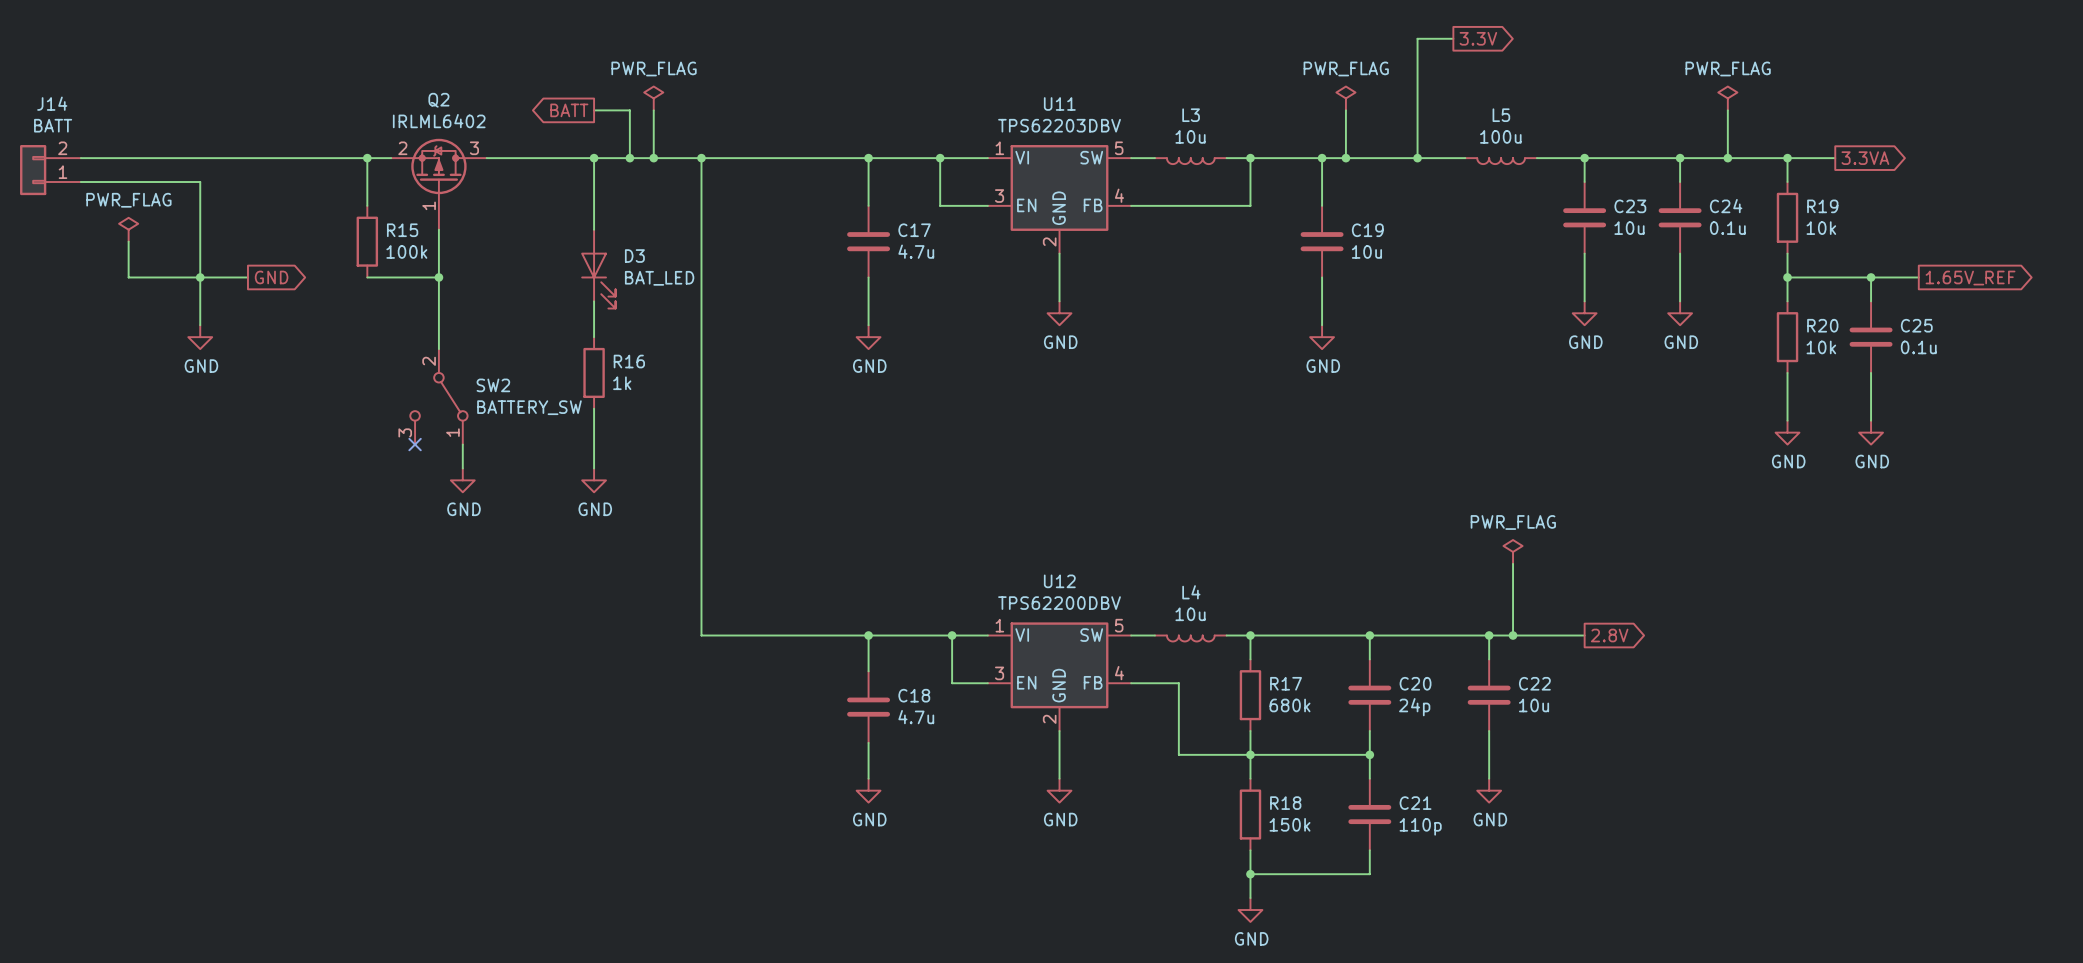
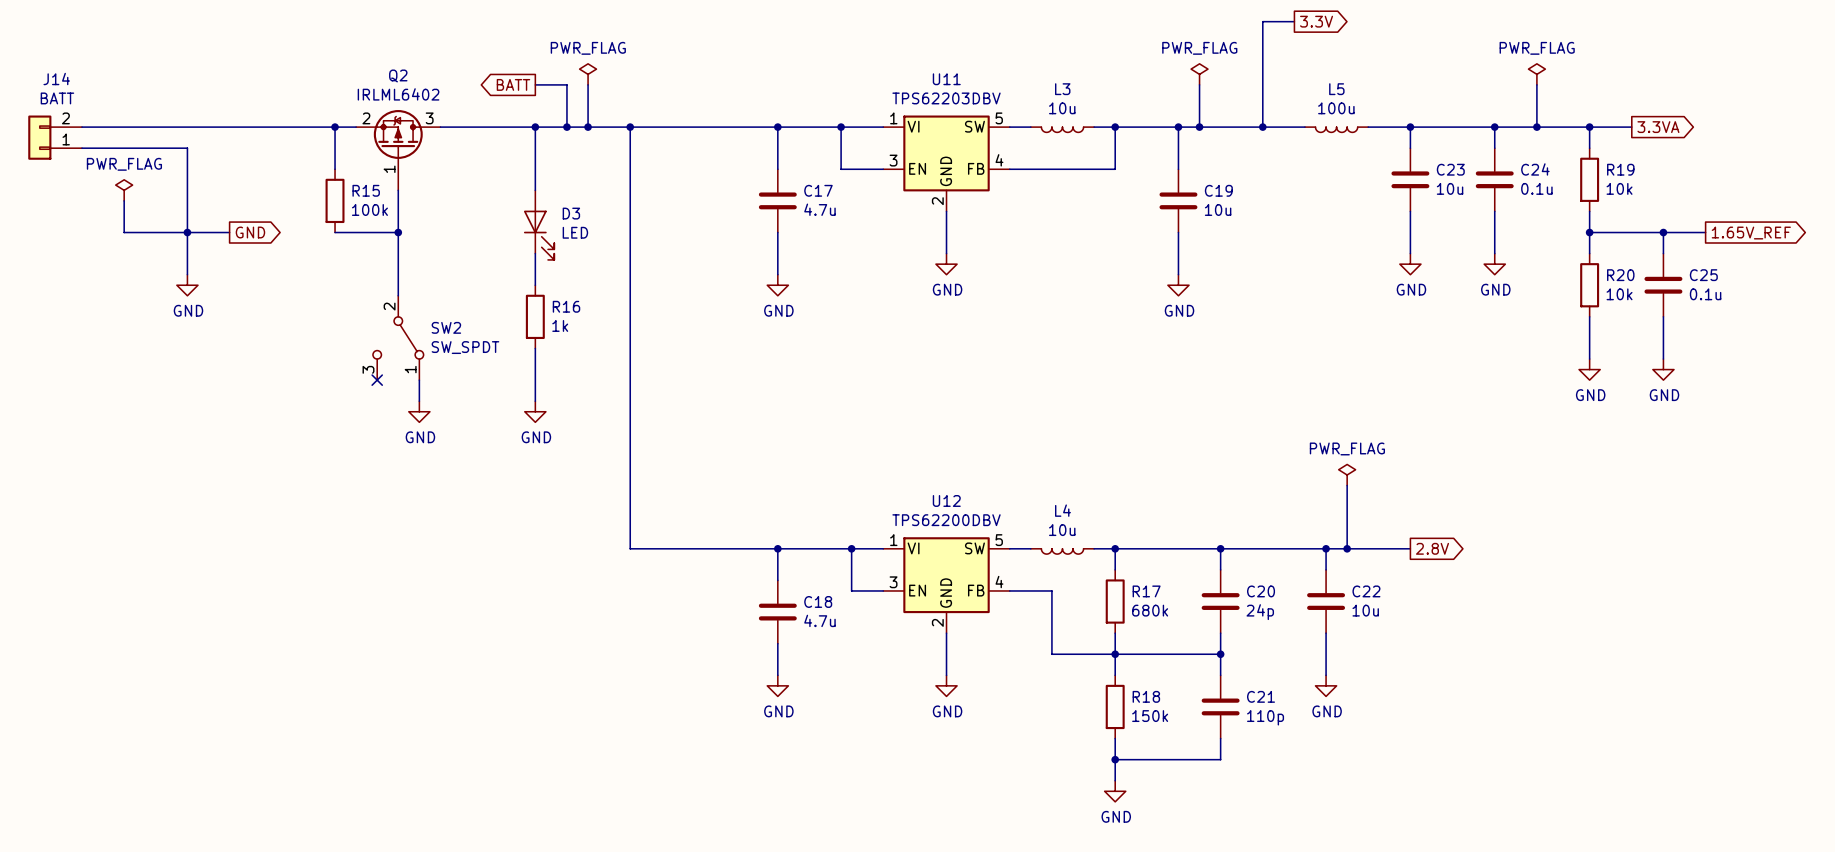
D3 value: BAT_LED (659, 278) -> LED (575, 232)
SW2 value: BATTERY_SW (529, 407) -> SW_SPDT (465, 347)

